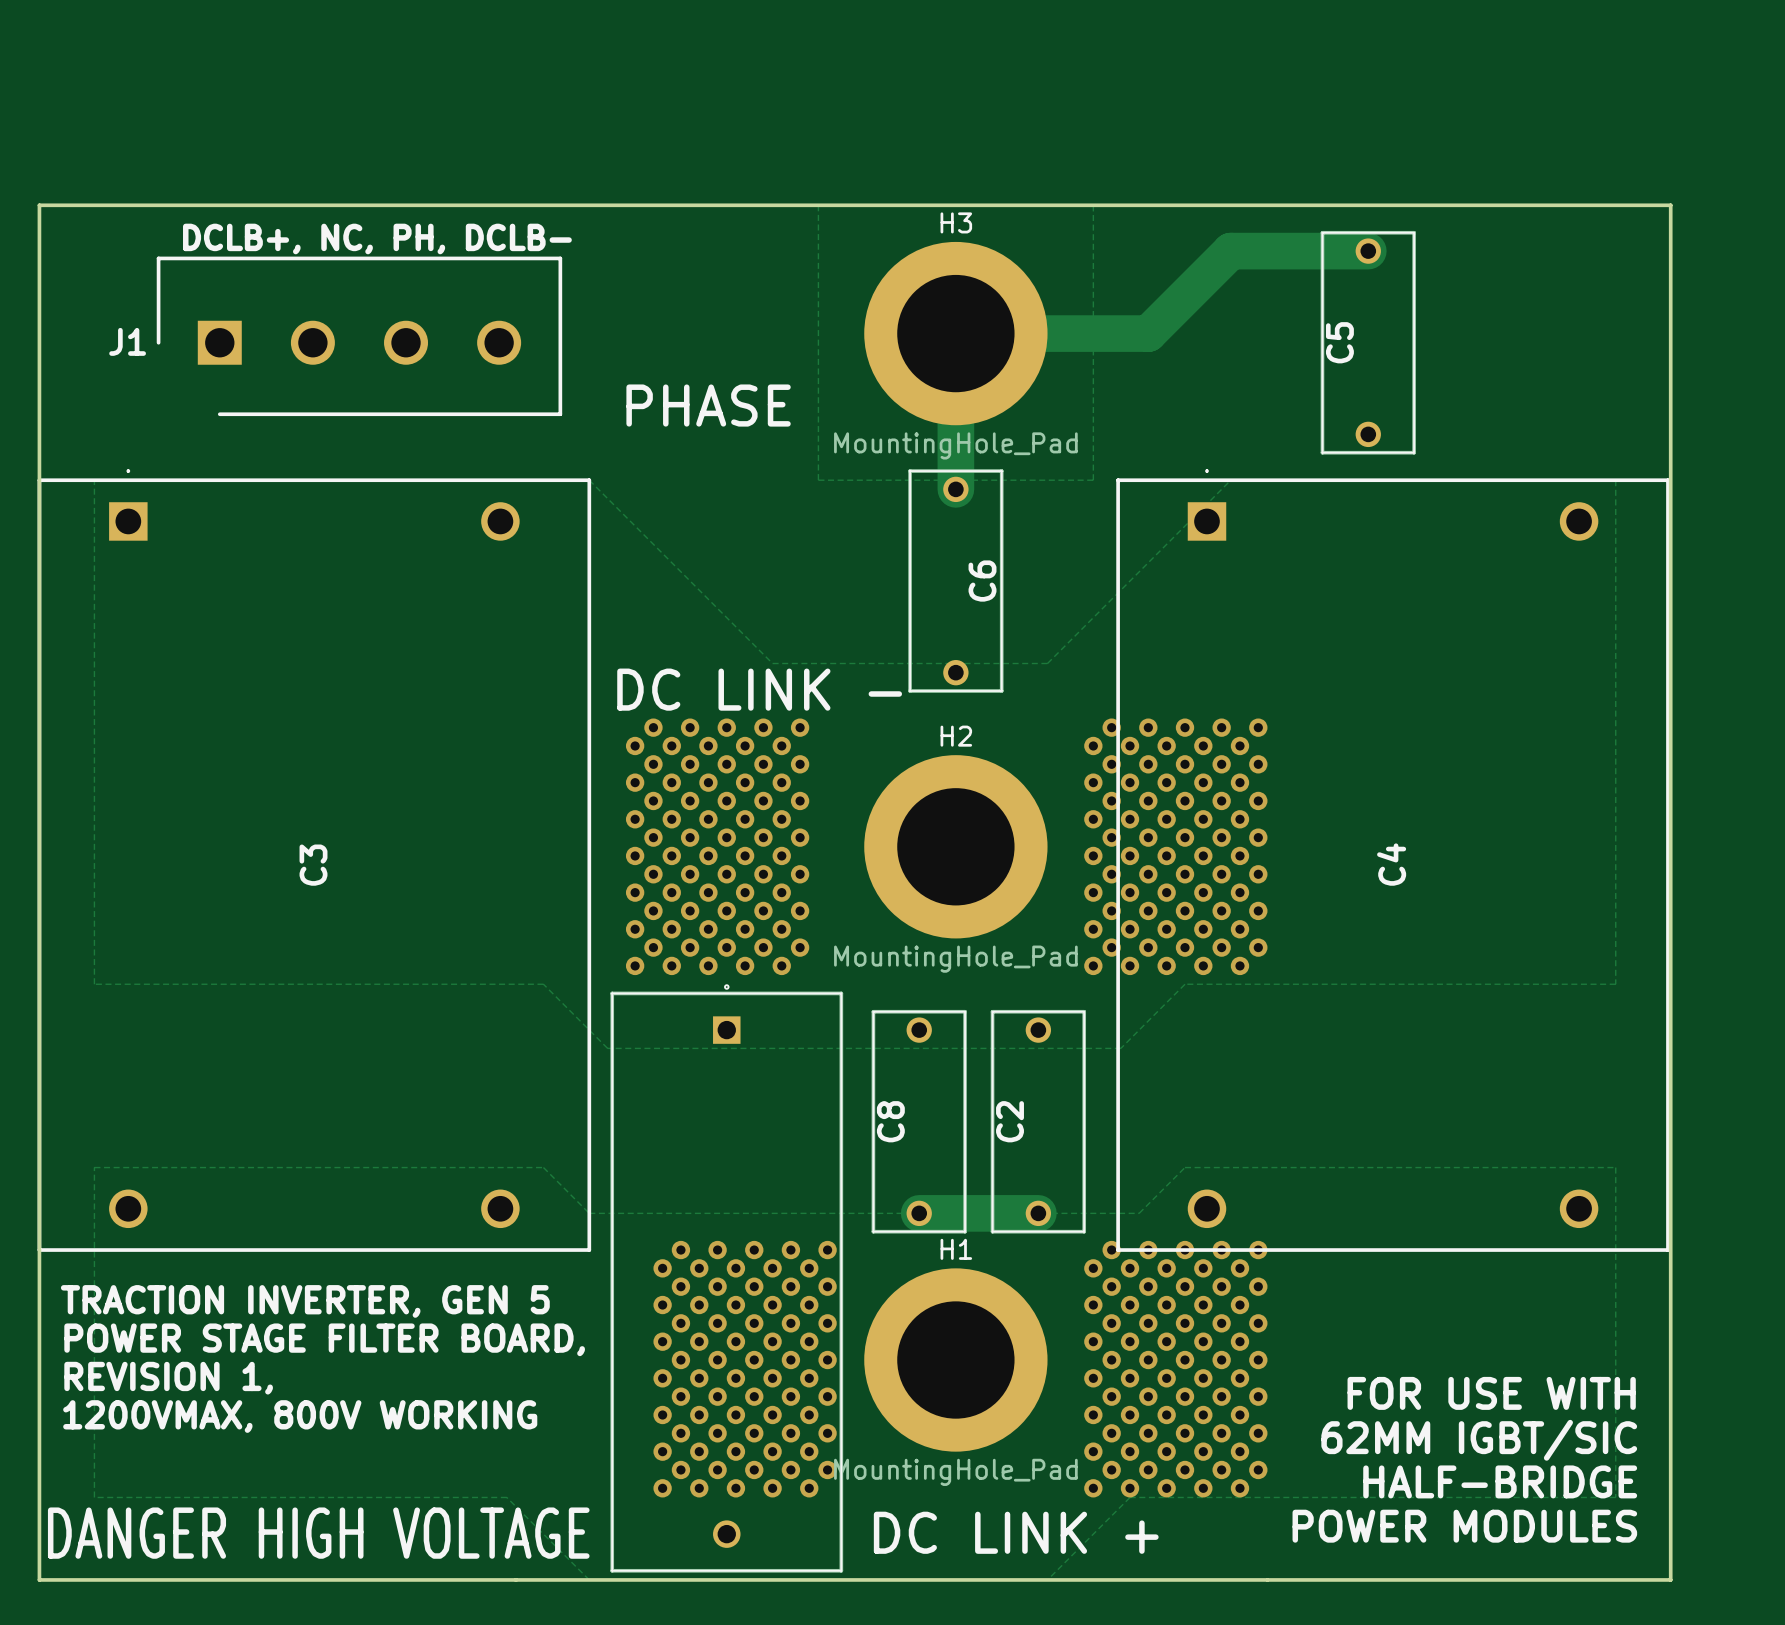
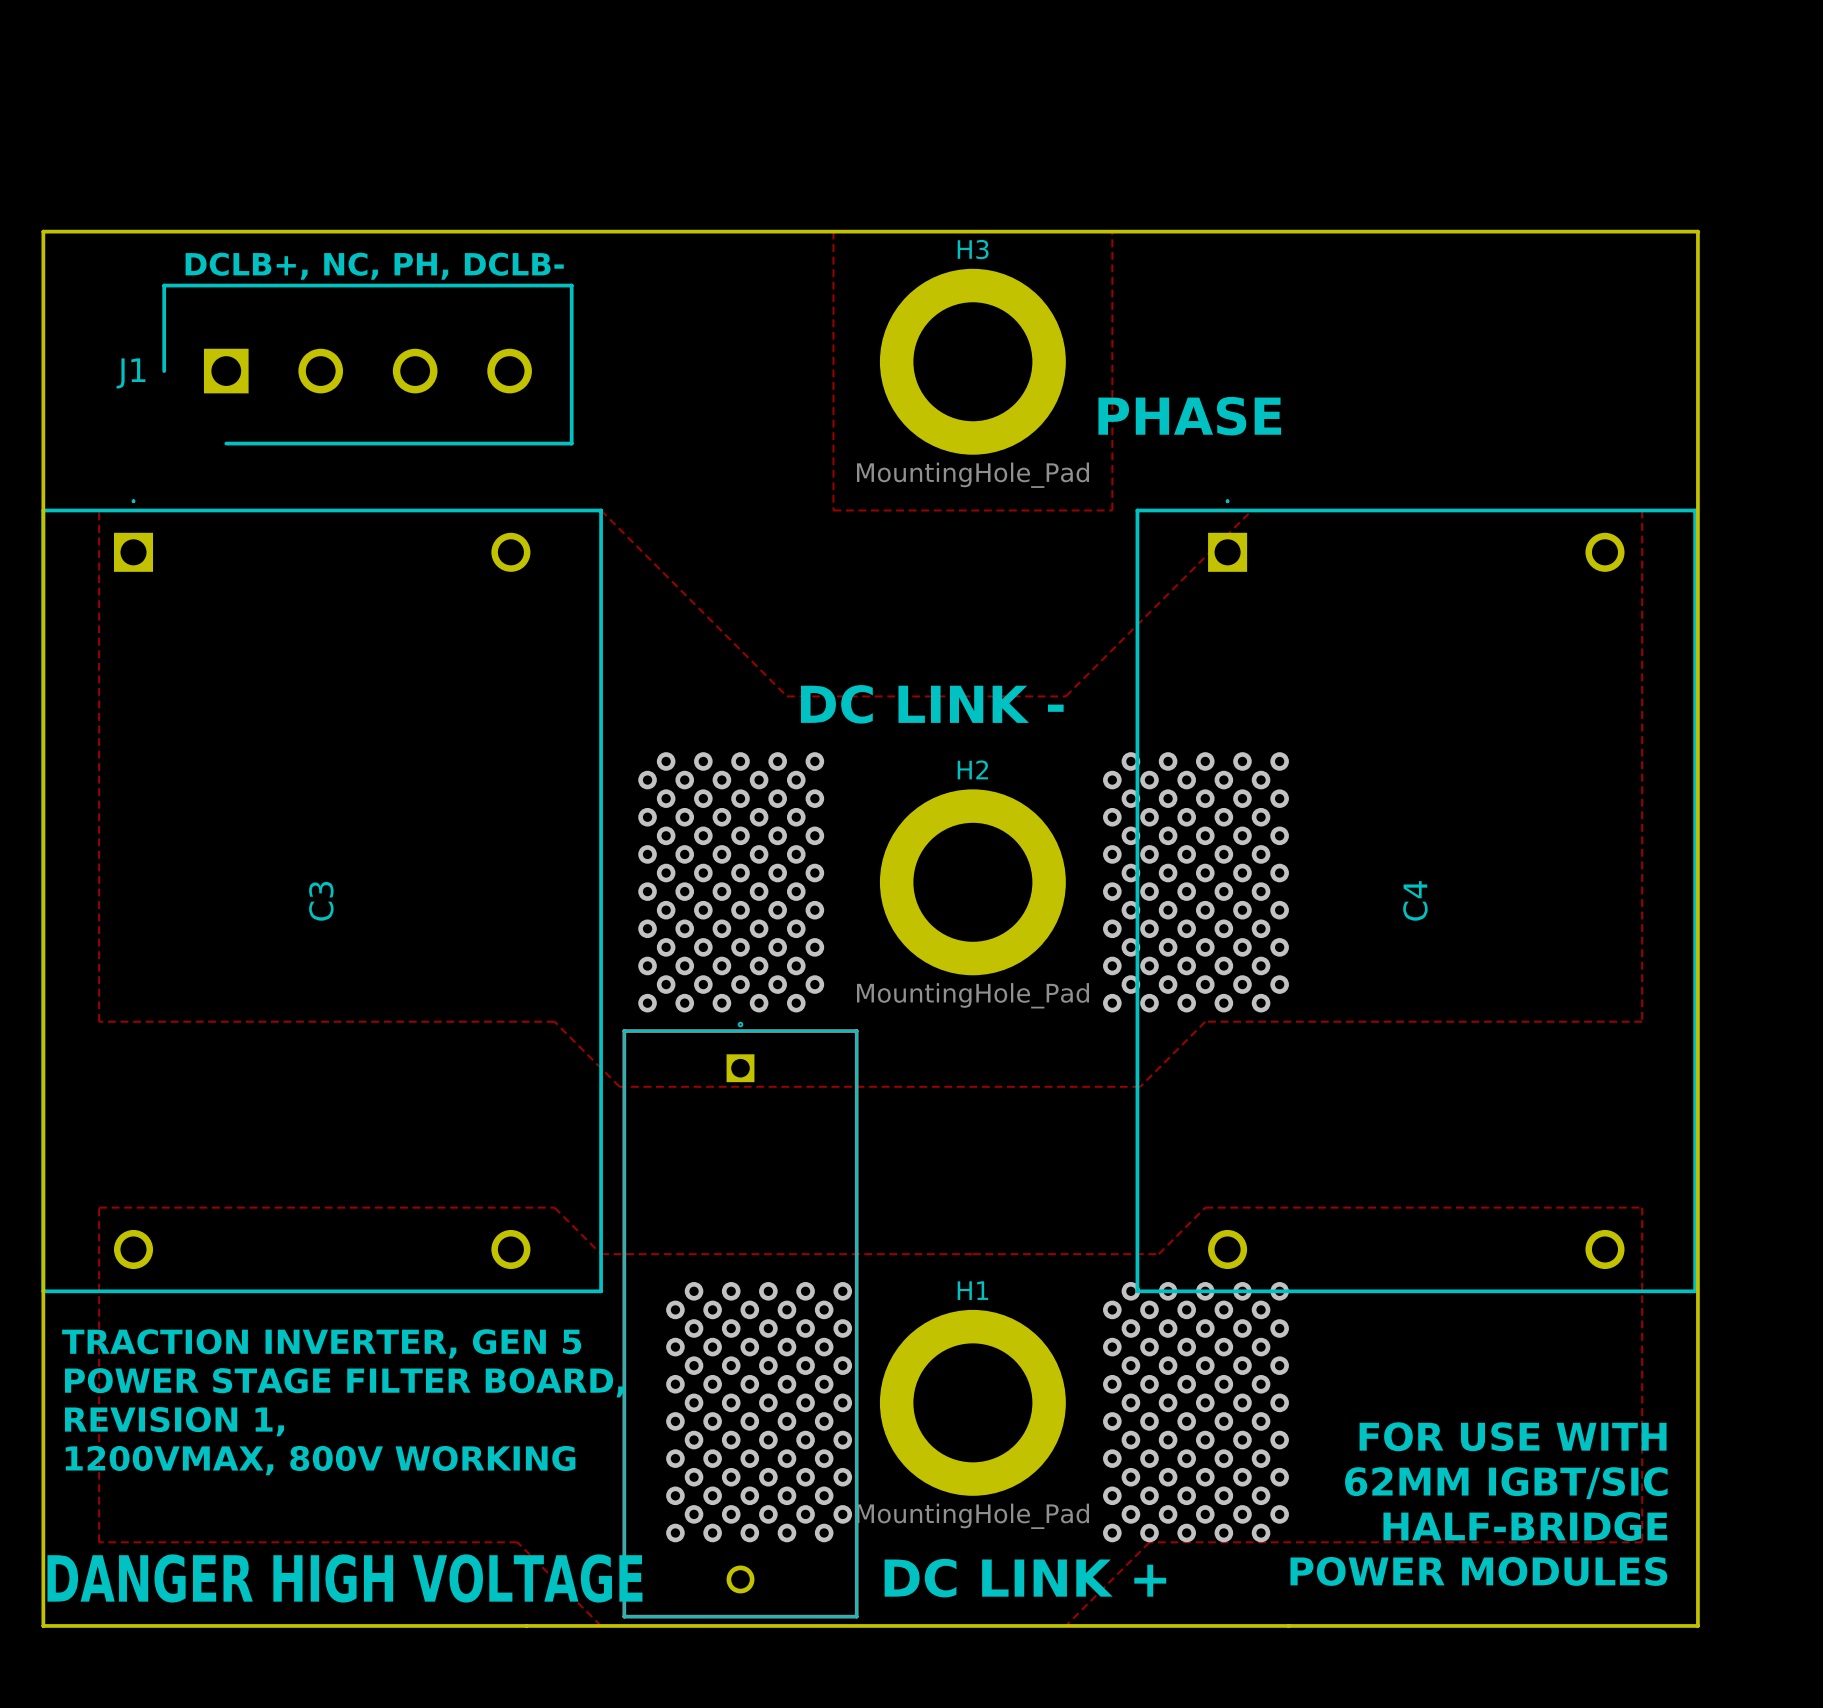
track: (1368, 251) (1230, 251) (1148, 333) (955, 333) (955, 489) -> none
C5: (1368, 342) -> none
text: none -> PHASE (1189, 416)
text: PHASE (708, 405) -> none
C6: (955, 581) -> none
text position: DC LINK - (759, 689) -> DC LINK - (932, 704)
C8: (919, 1121) -> none
C2: (1038, 1121) -> none
track: (919, 1213) (1038, 1213) -> none

